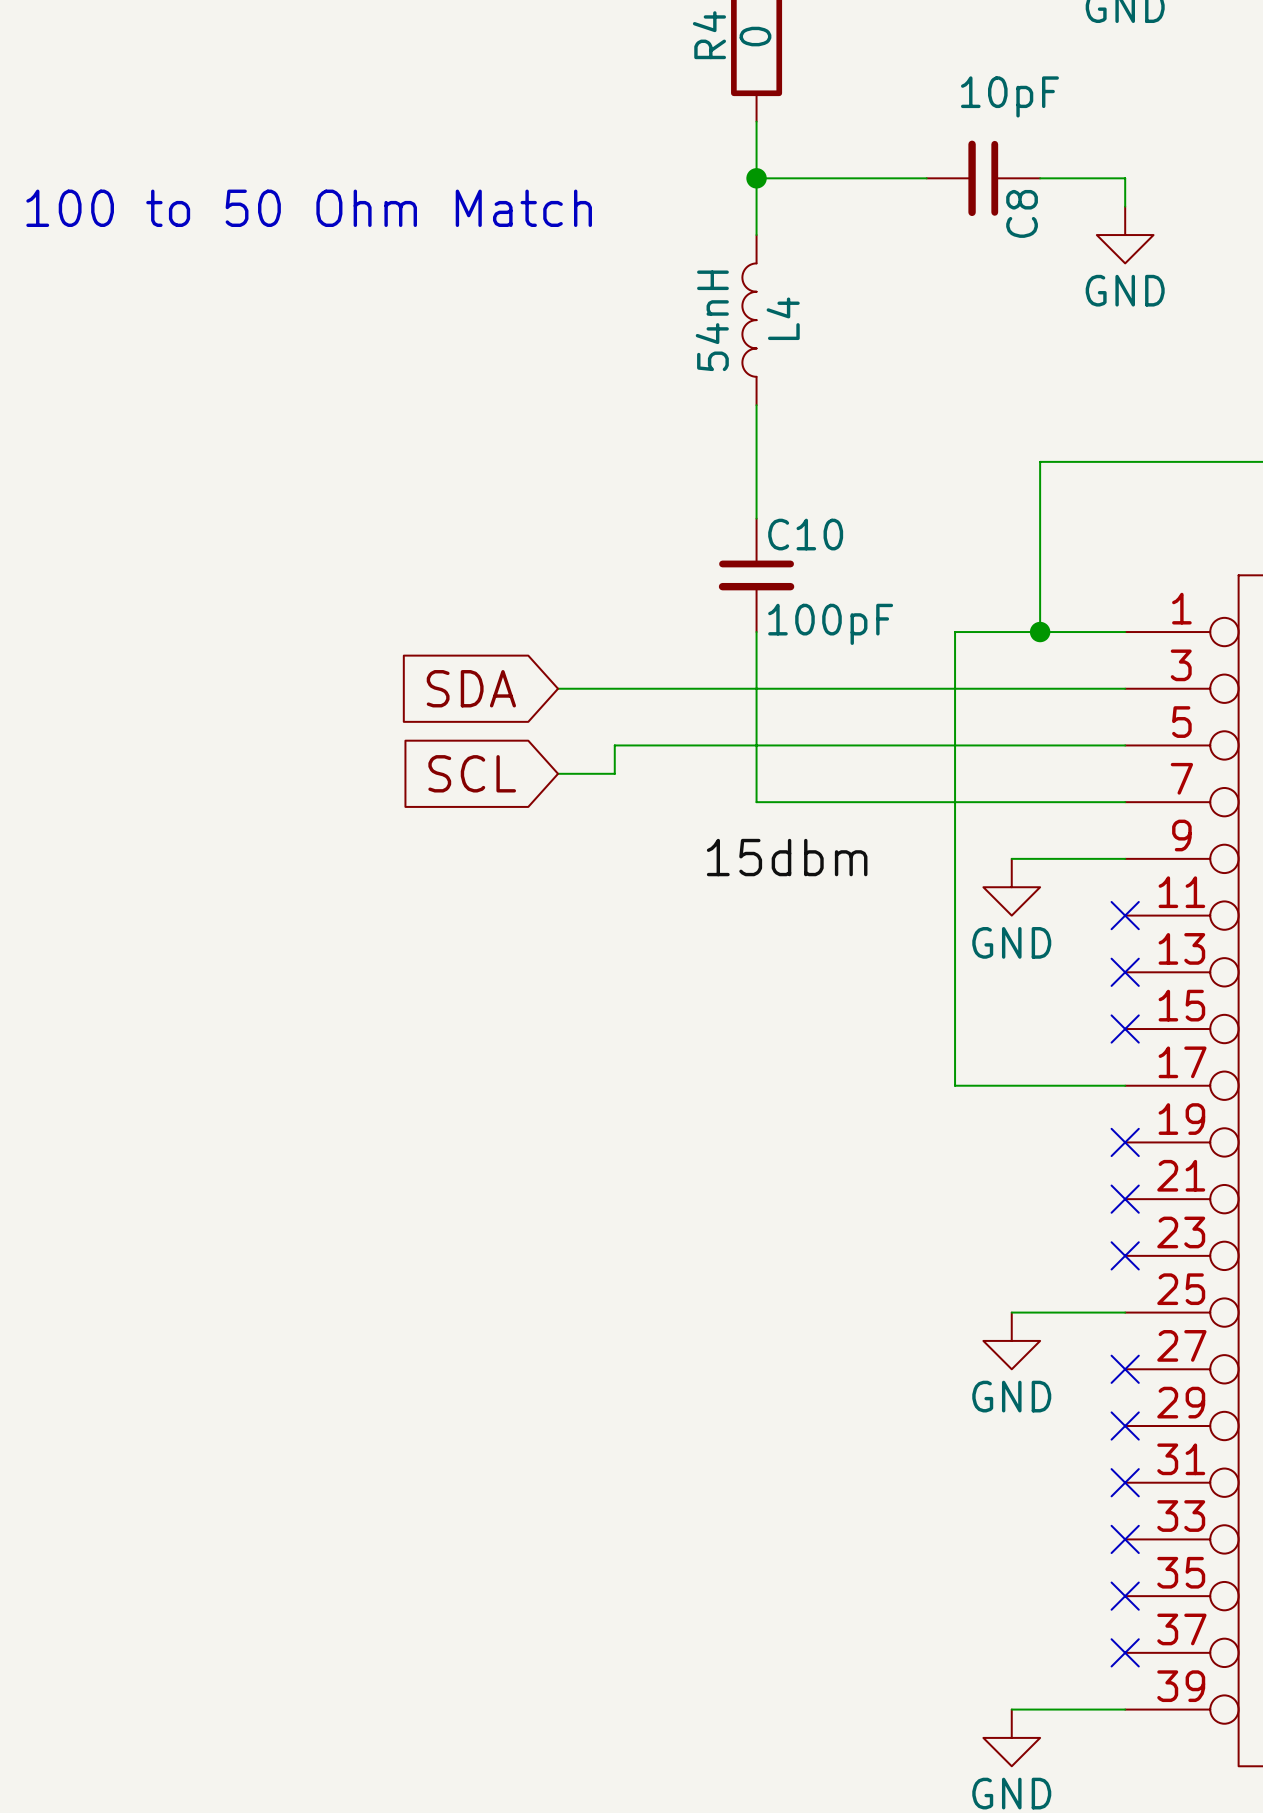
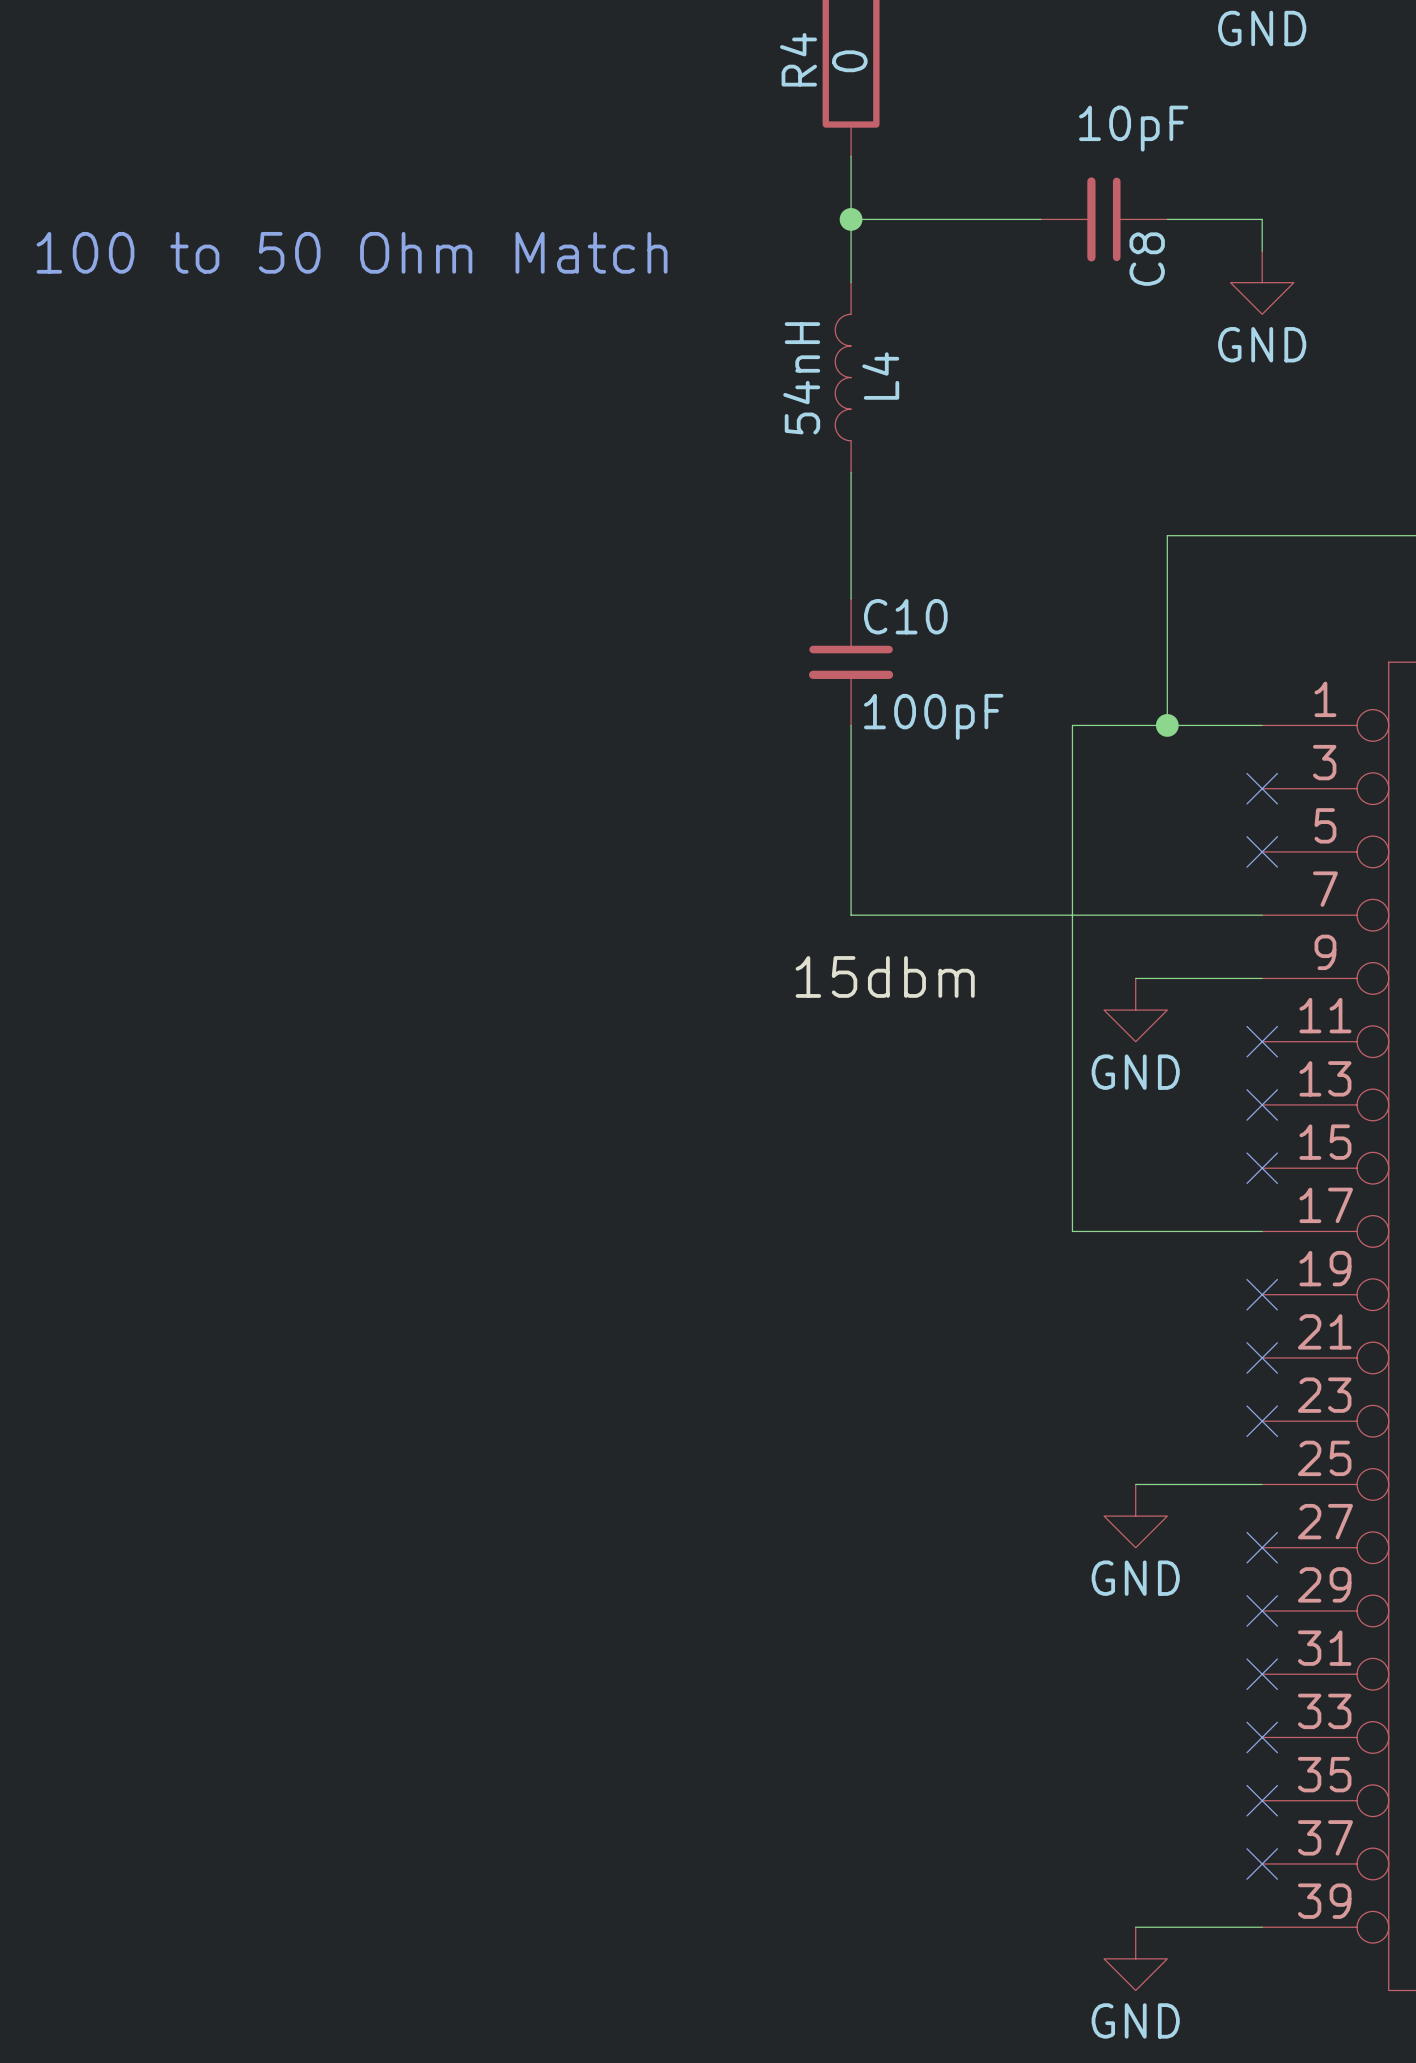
global label: SDA (471, 688) -> none
wire: (558, 688) (1125, 688) -> none
no-connect mark: none -> (1262, 788)
wire: (1125, 745) (614, 745) (614, 773) (558, 773) -> none
no-connect mark: none -> (1262, 851)
global label: SCL (472, 773) -> none

